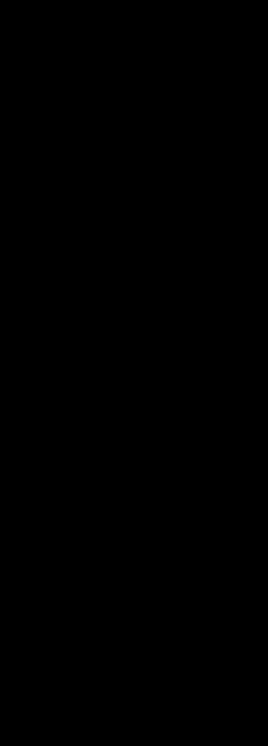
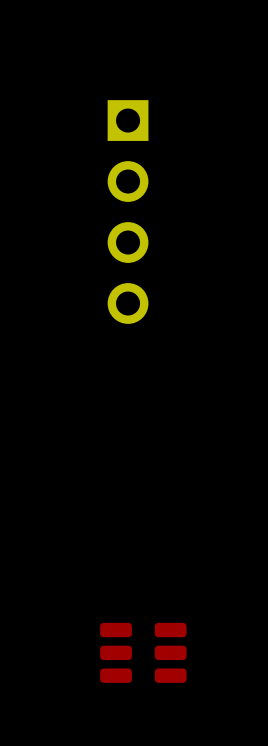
part: none -> (128, 212)
part: none -> (143, 652)

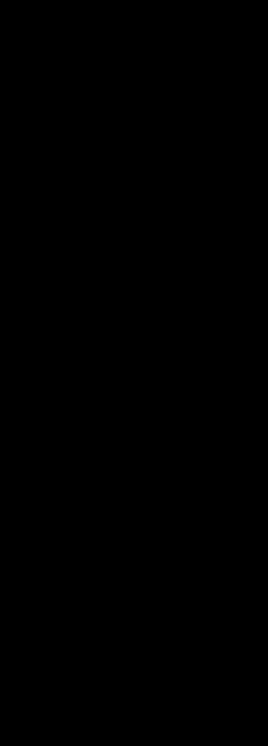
part: (128, 212) -> none
part: (143, 652) -> none

